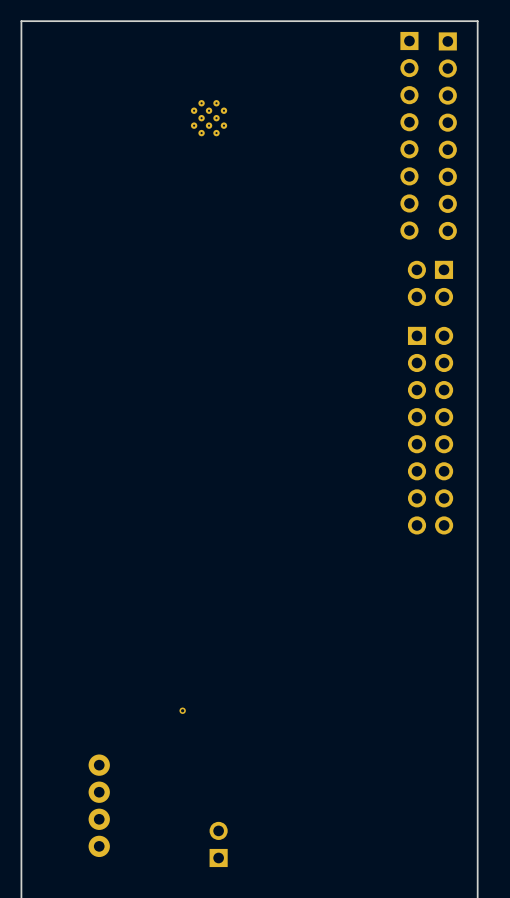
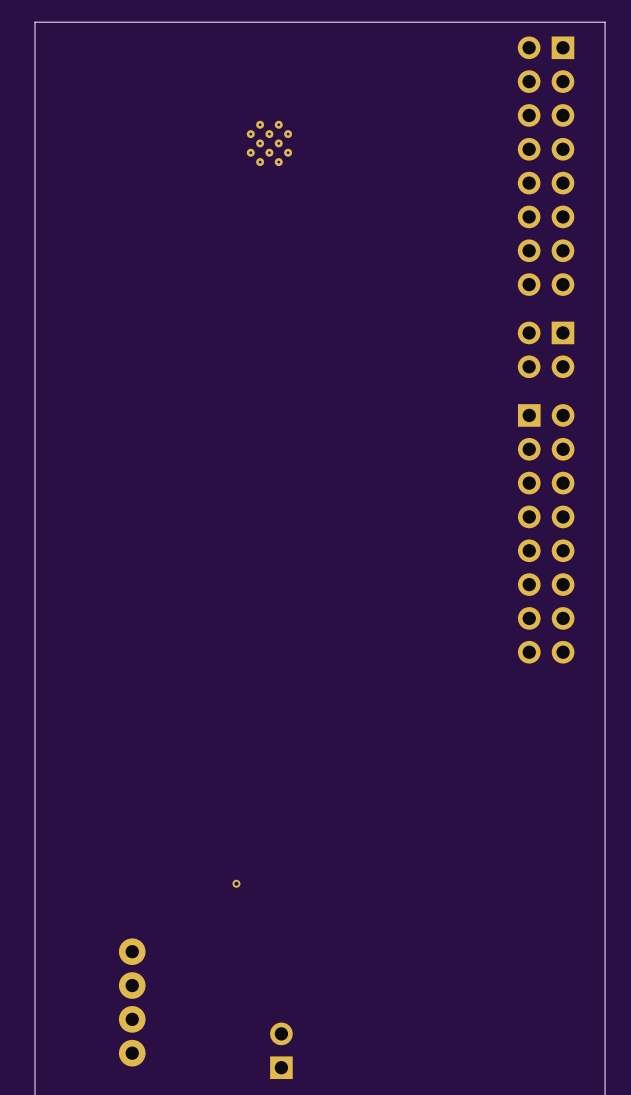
part: (409, 135) -> none
part: none -> (546, 166)
part: (447, 136) -> none

